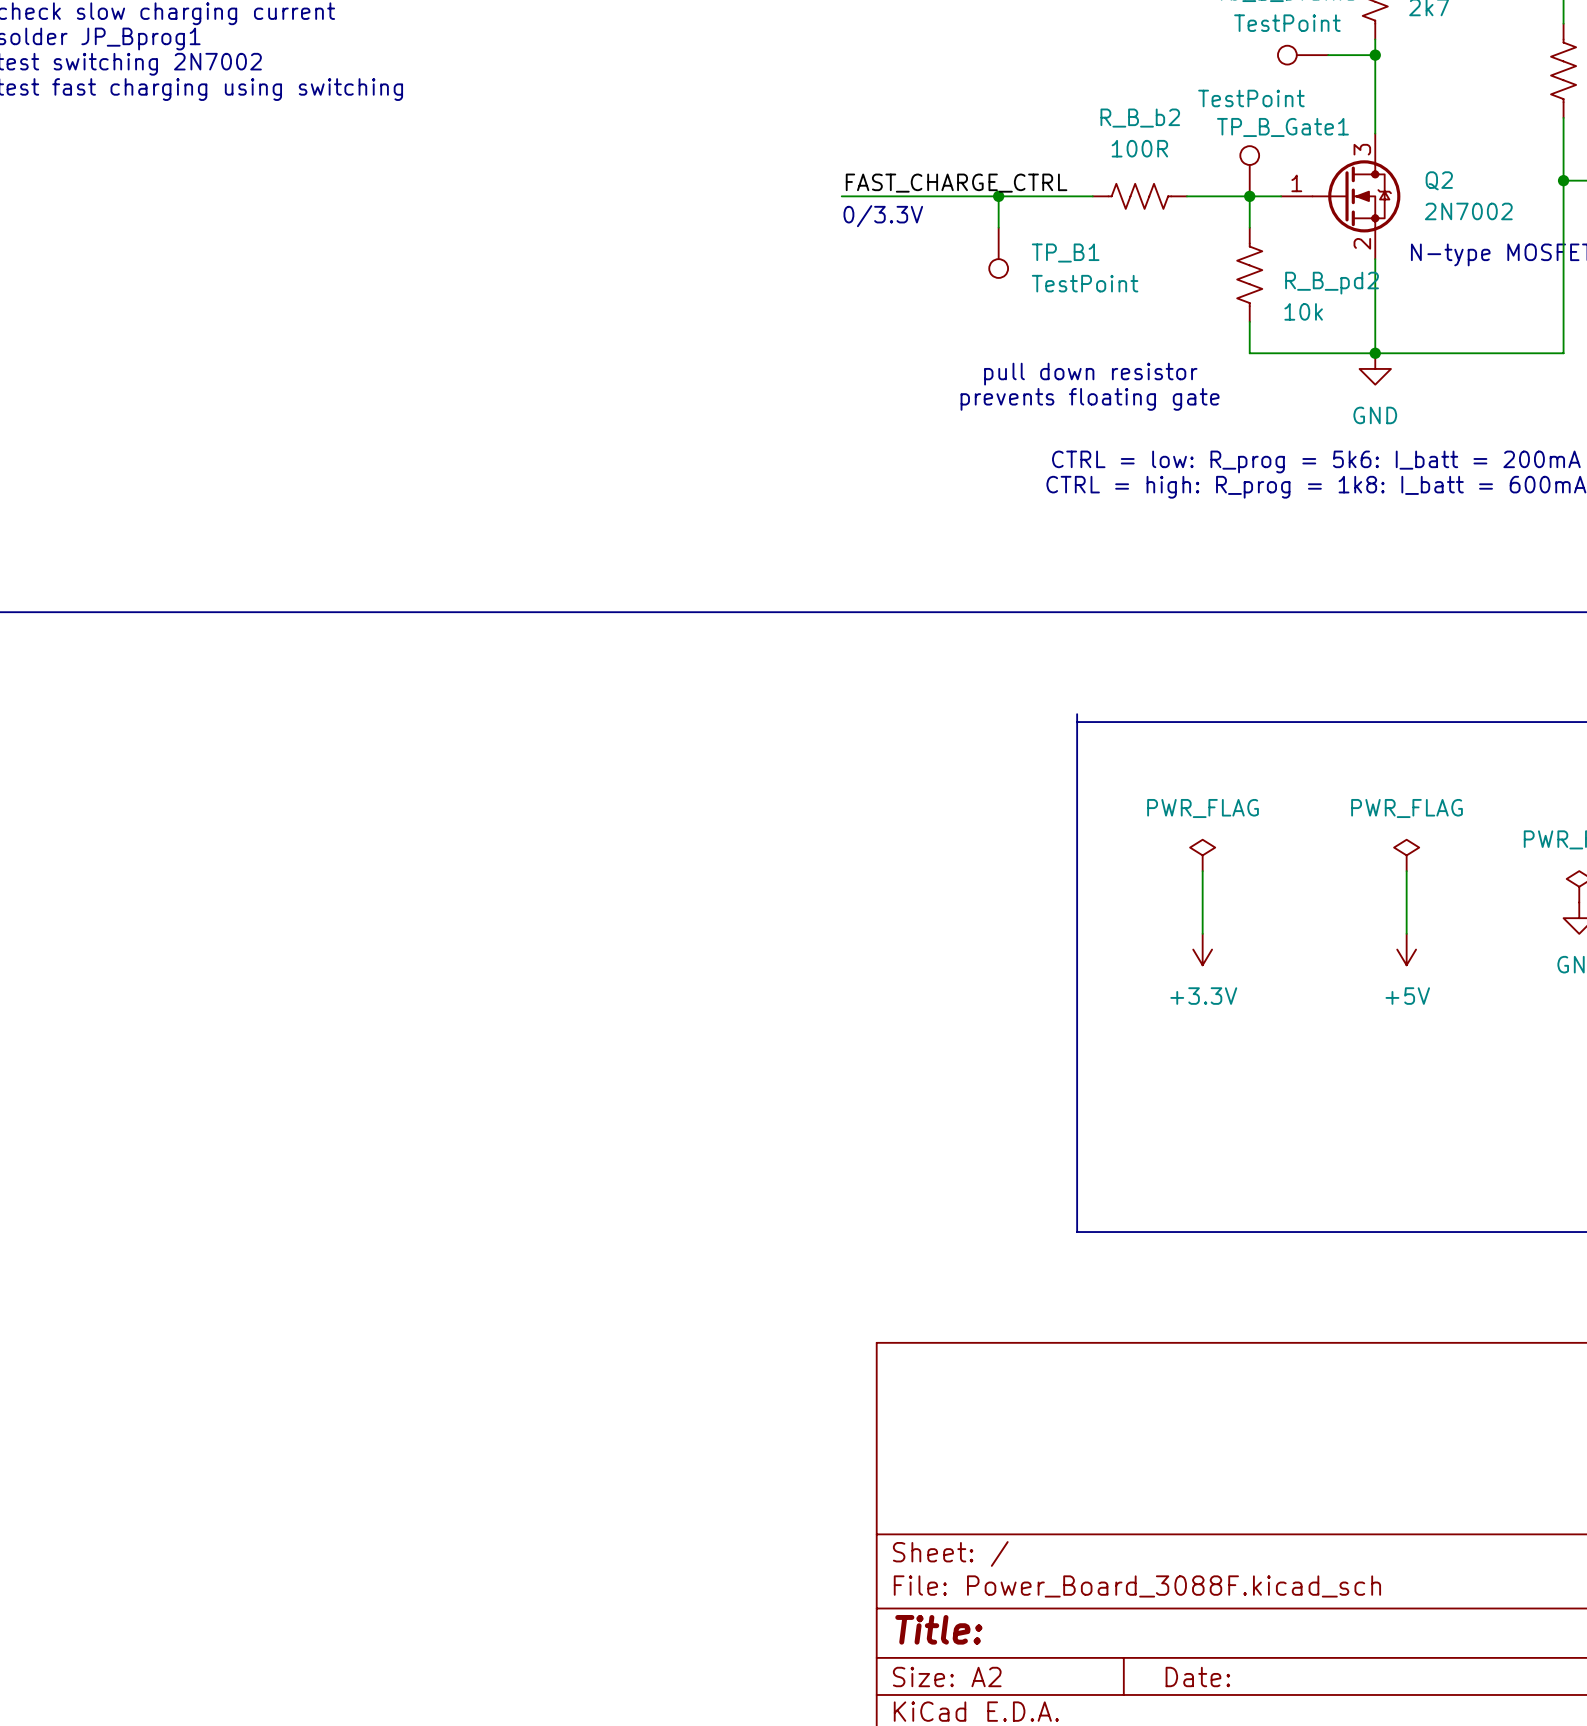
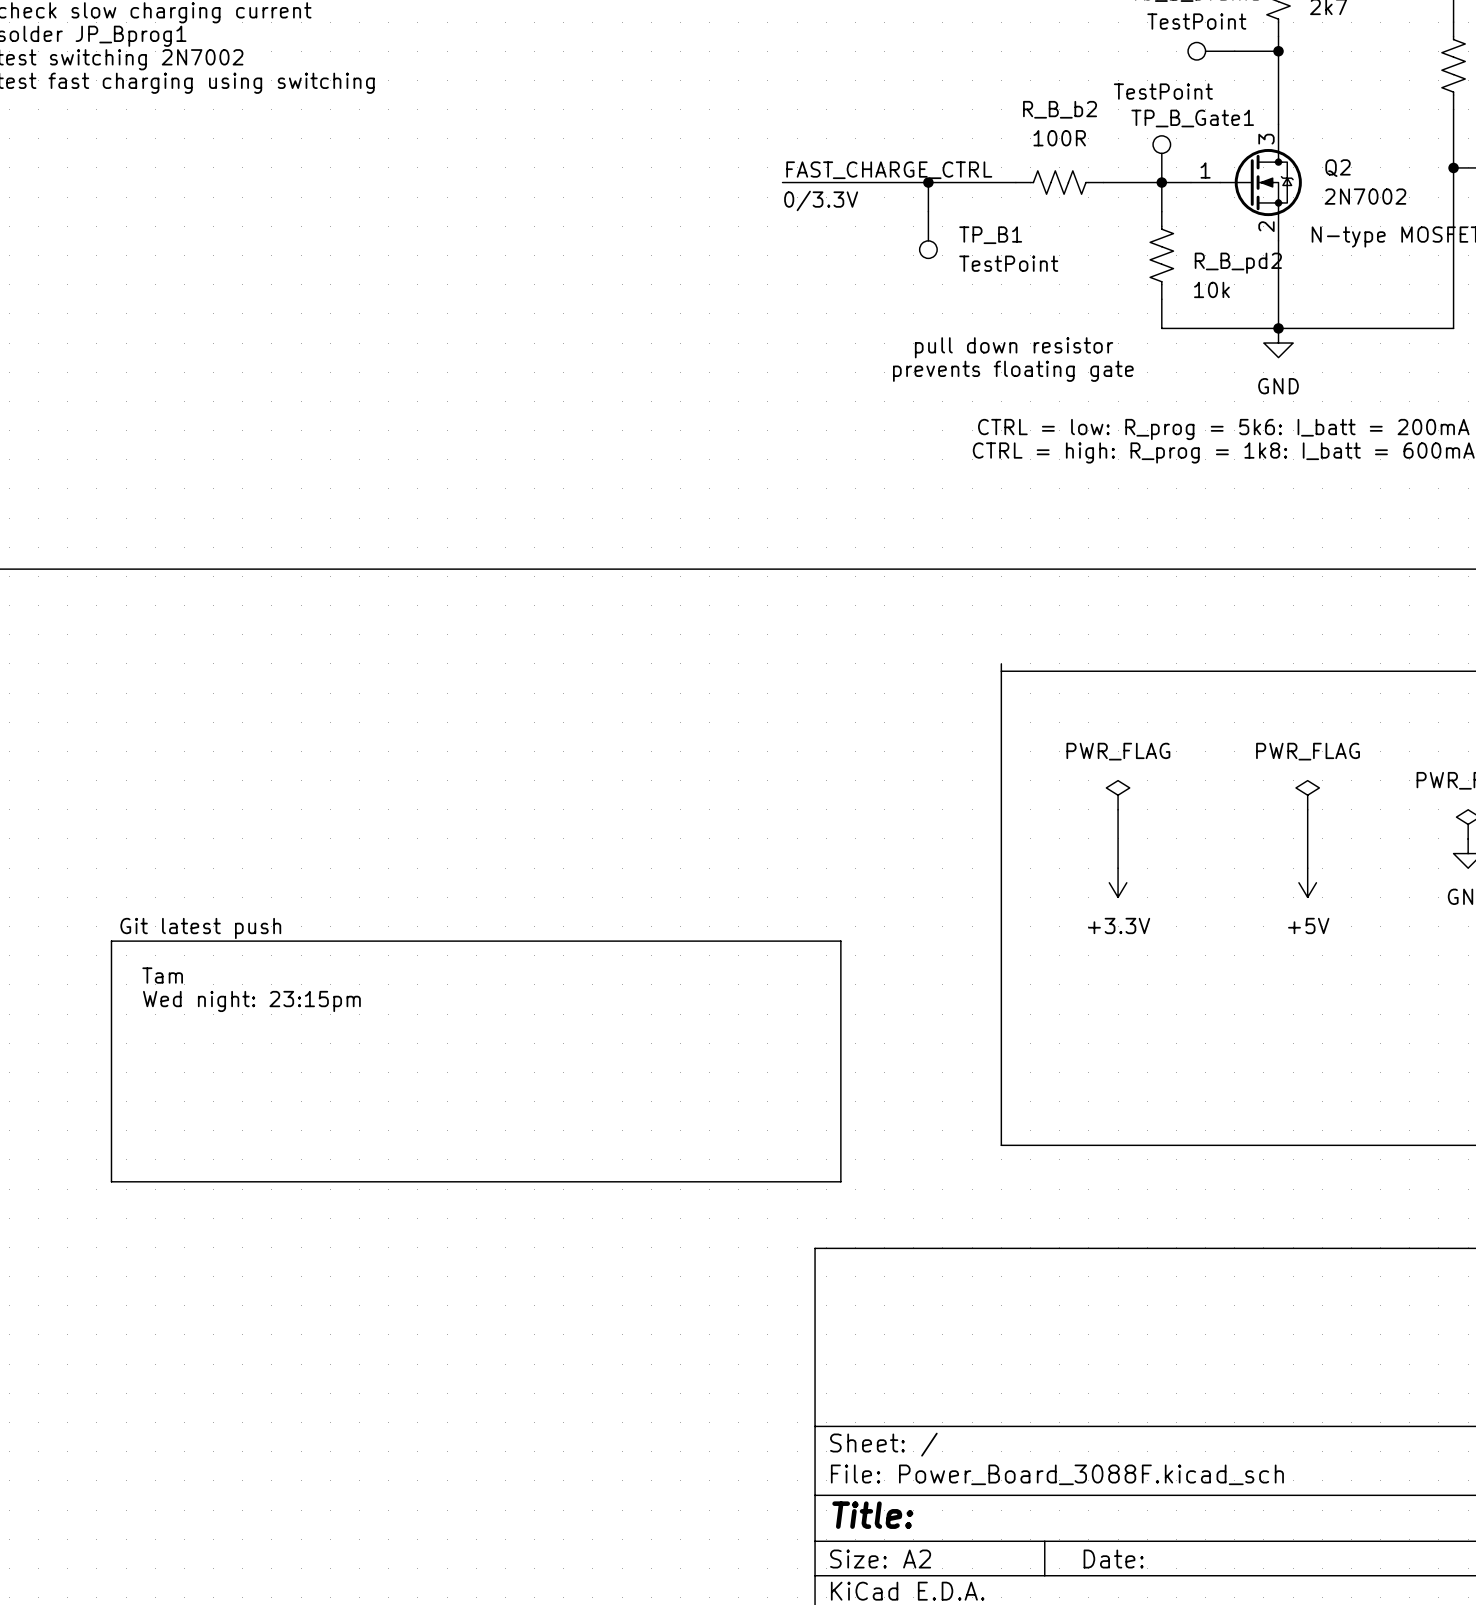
text: none -> Git latest push (200, 928)
line: none -> (111, 941) (840, 941) (840, 1181) (111, 1181) (111, 941)
text: none -> Tam (162, 975)
text: none -> Wed night: 23:15pm (251, 1001)

